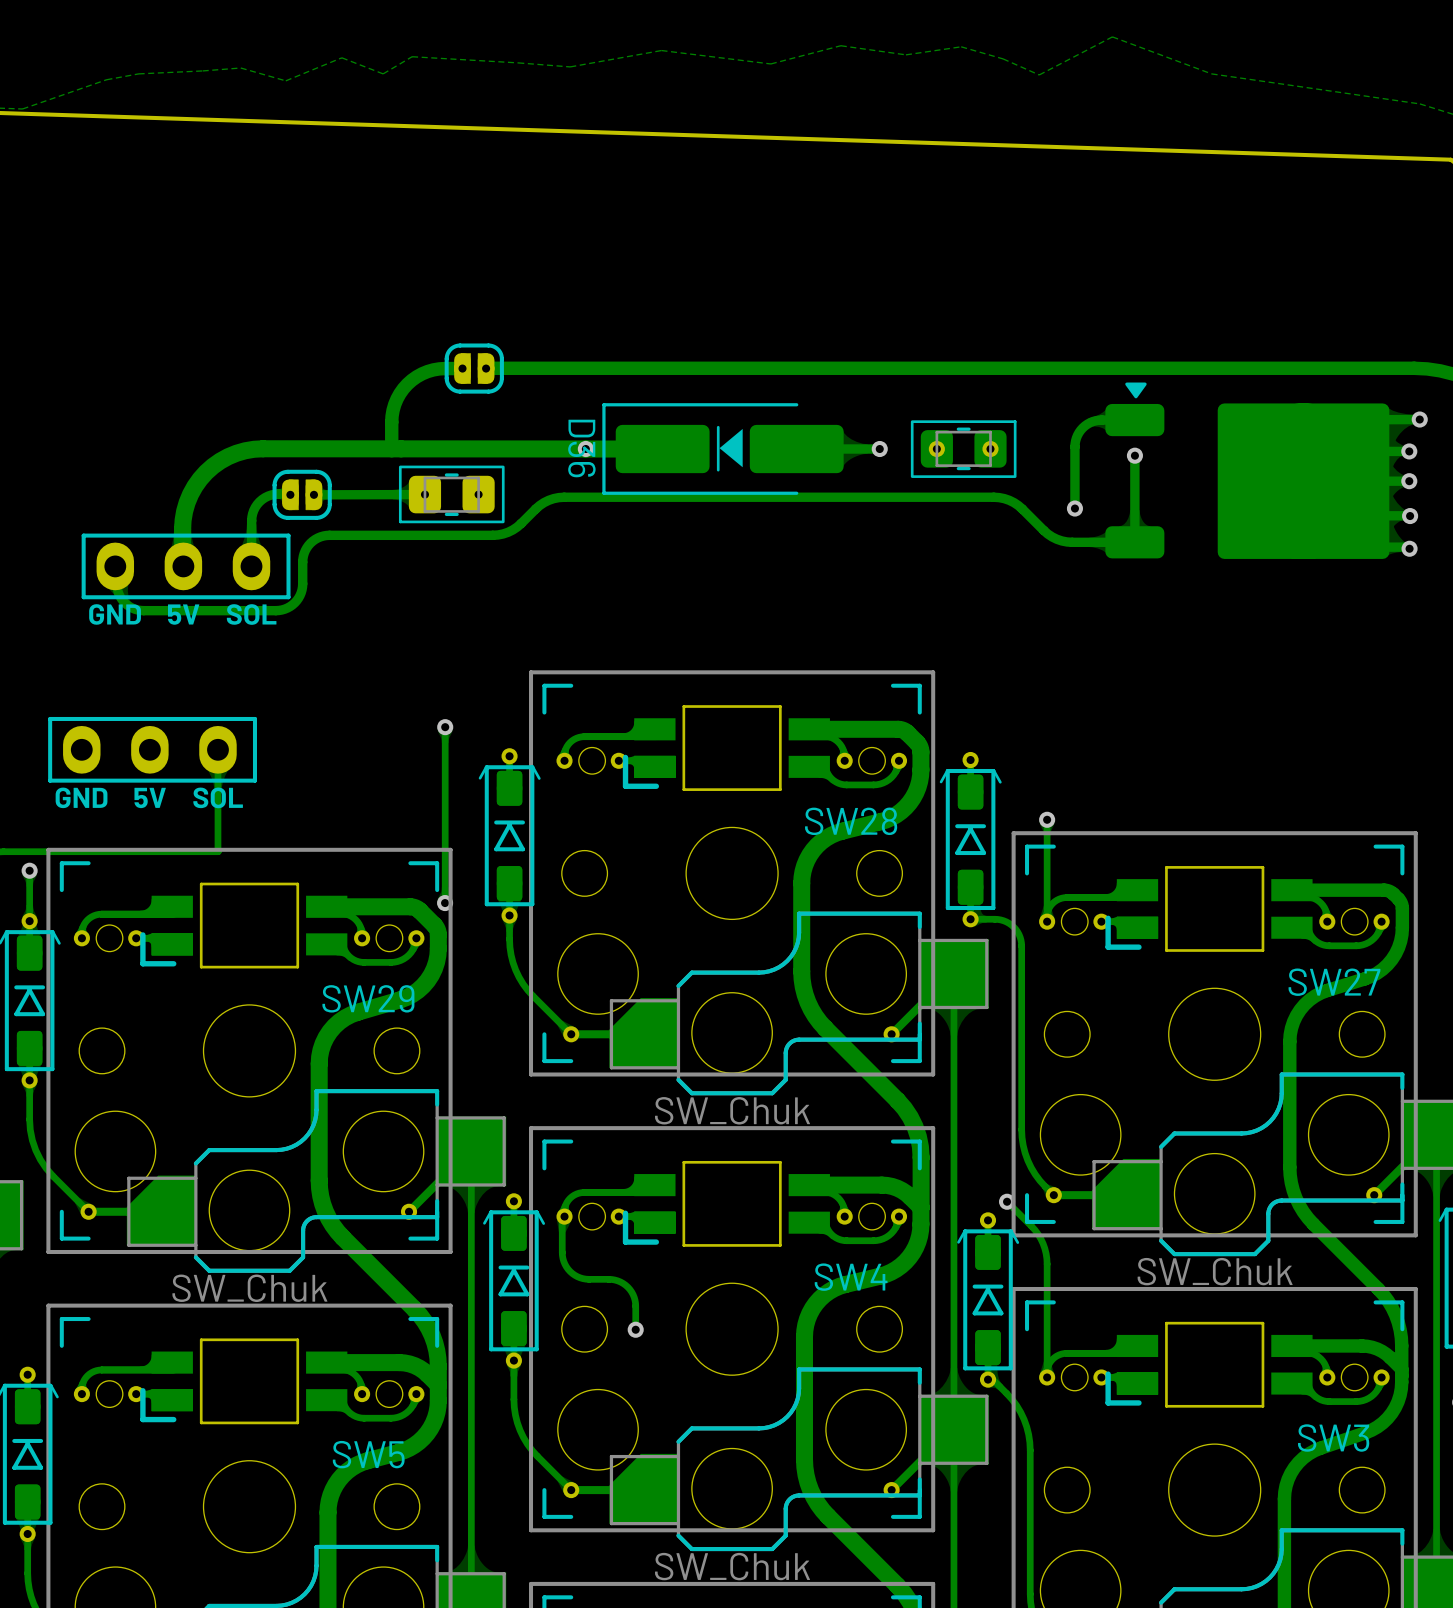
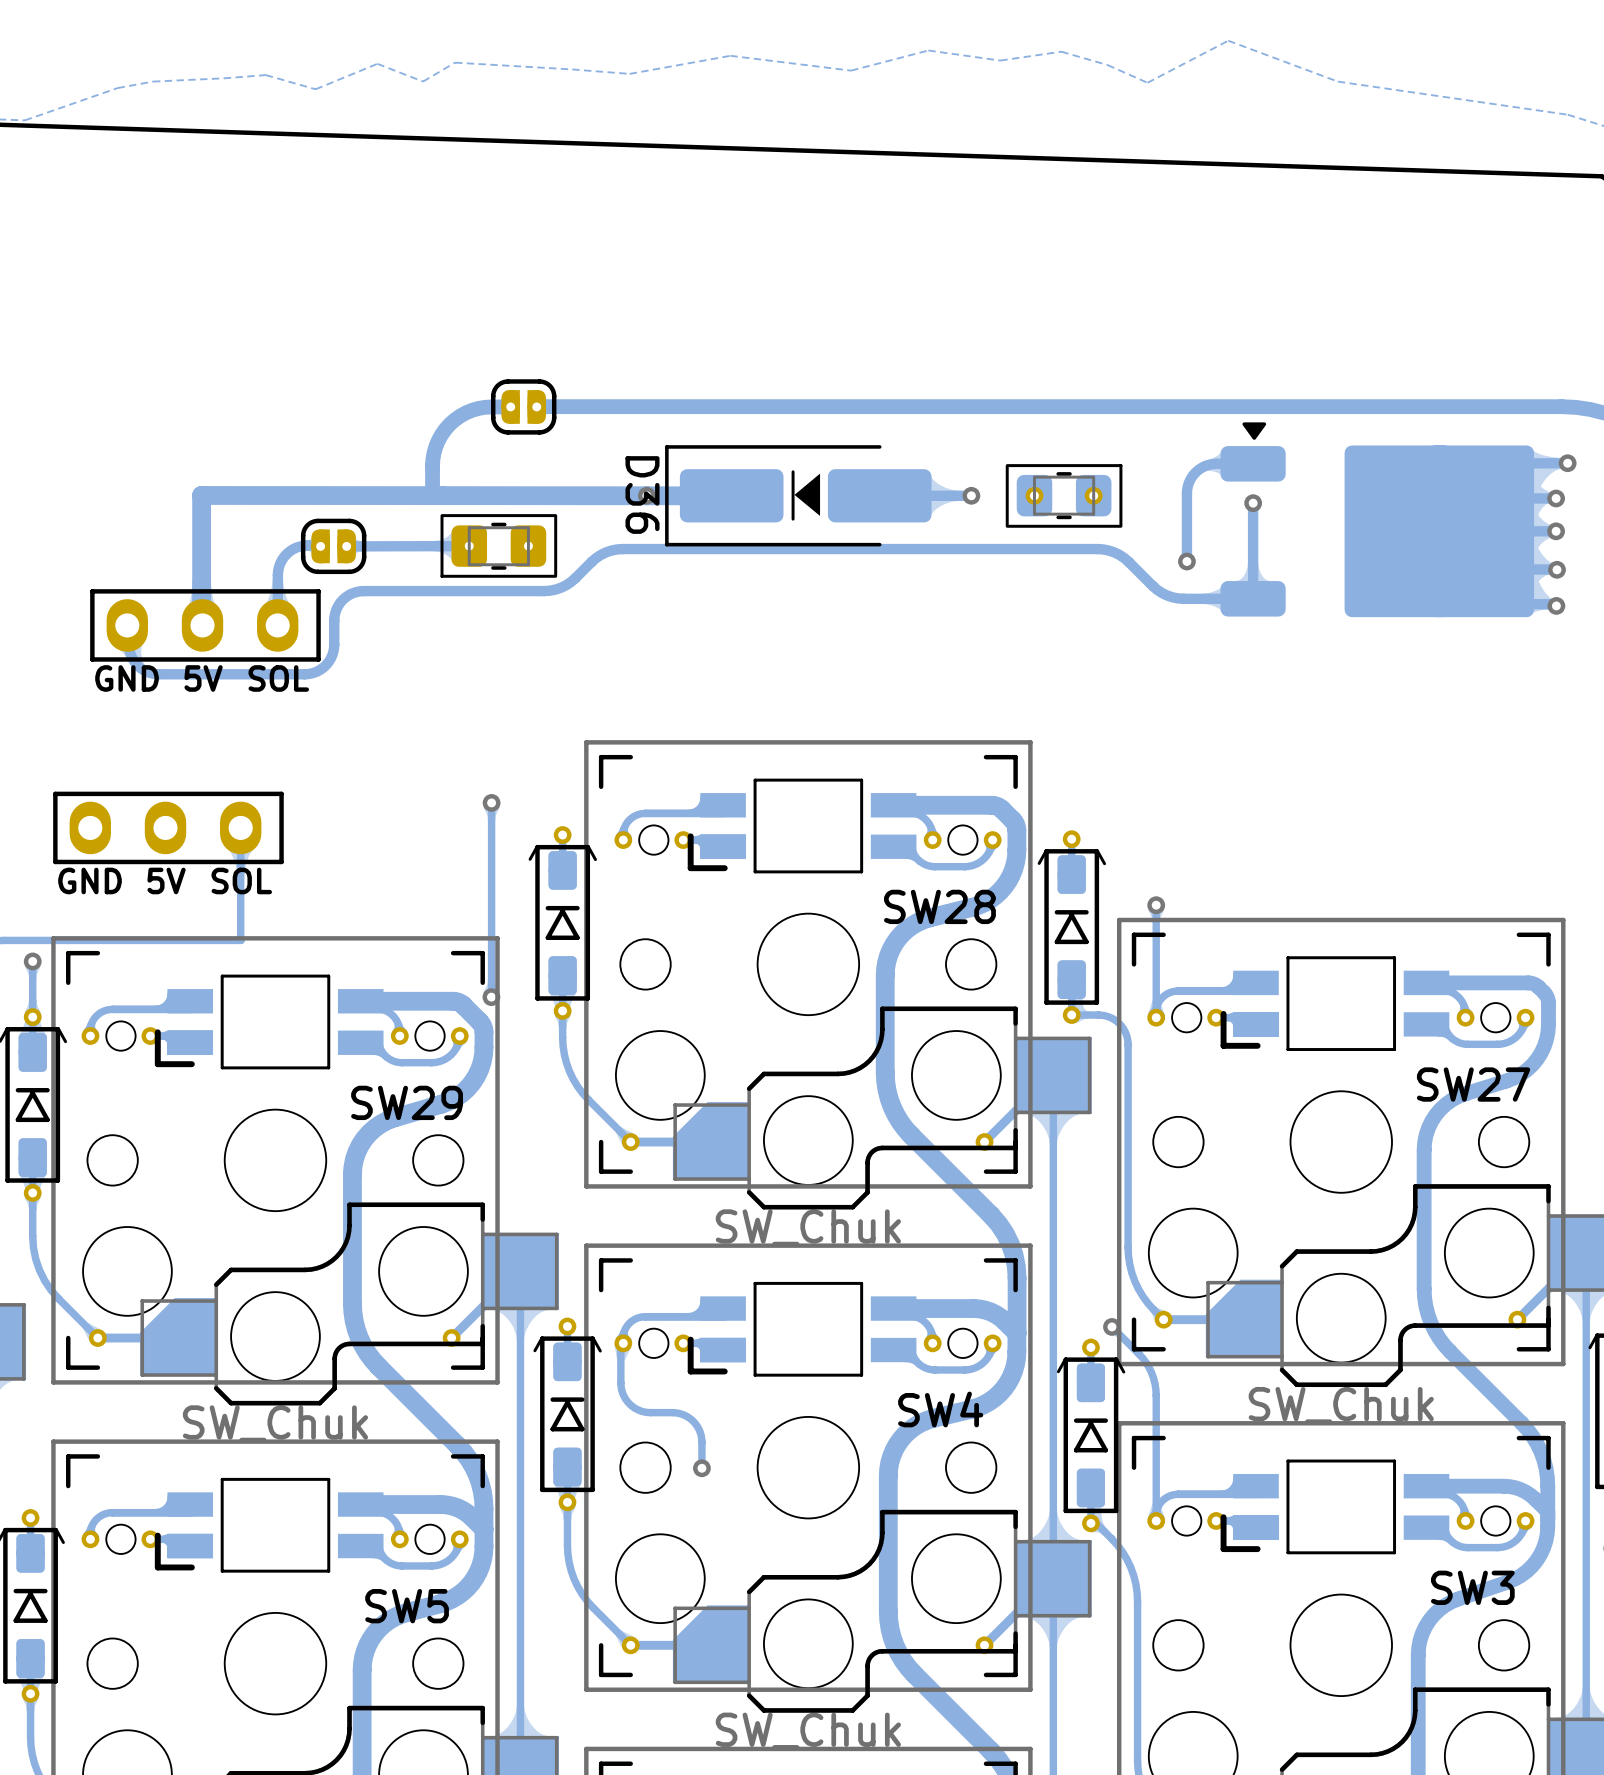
track: (263, 448) (236, 453) (220, 461) (206, 472) (190, 494) (184, 511) (182, 529) -> (290, 495) (201, 495) (201, 584)

